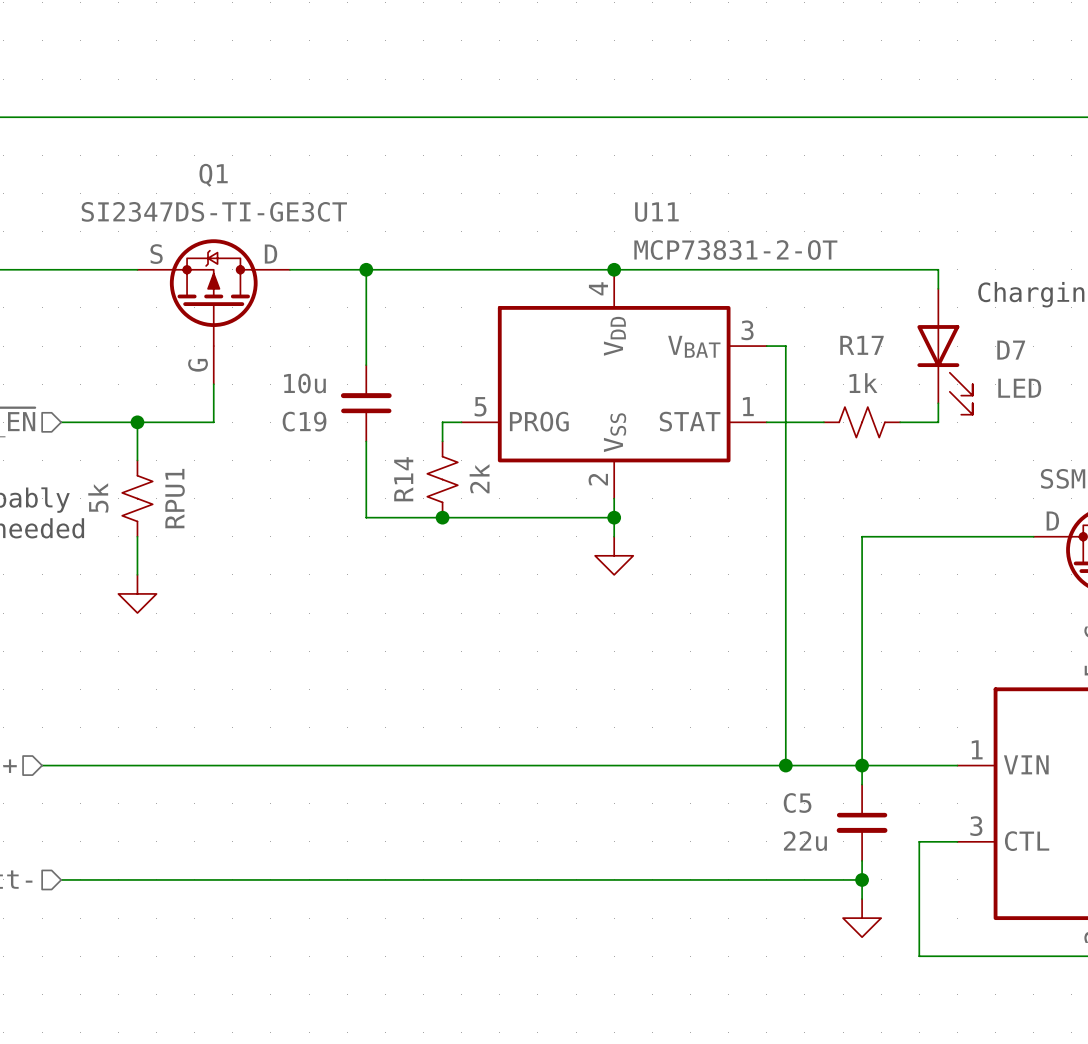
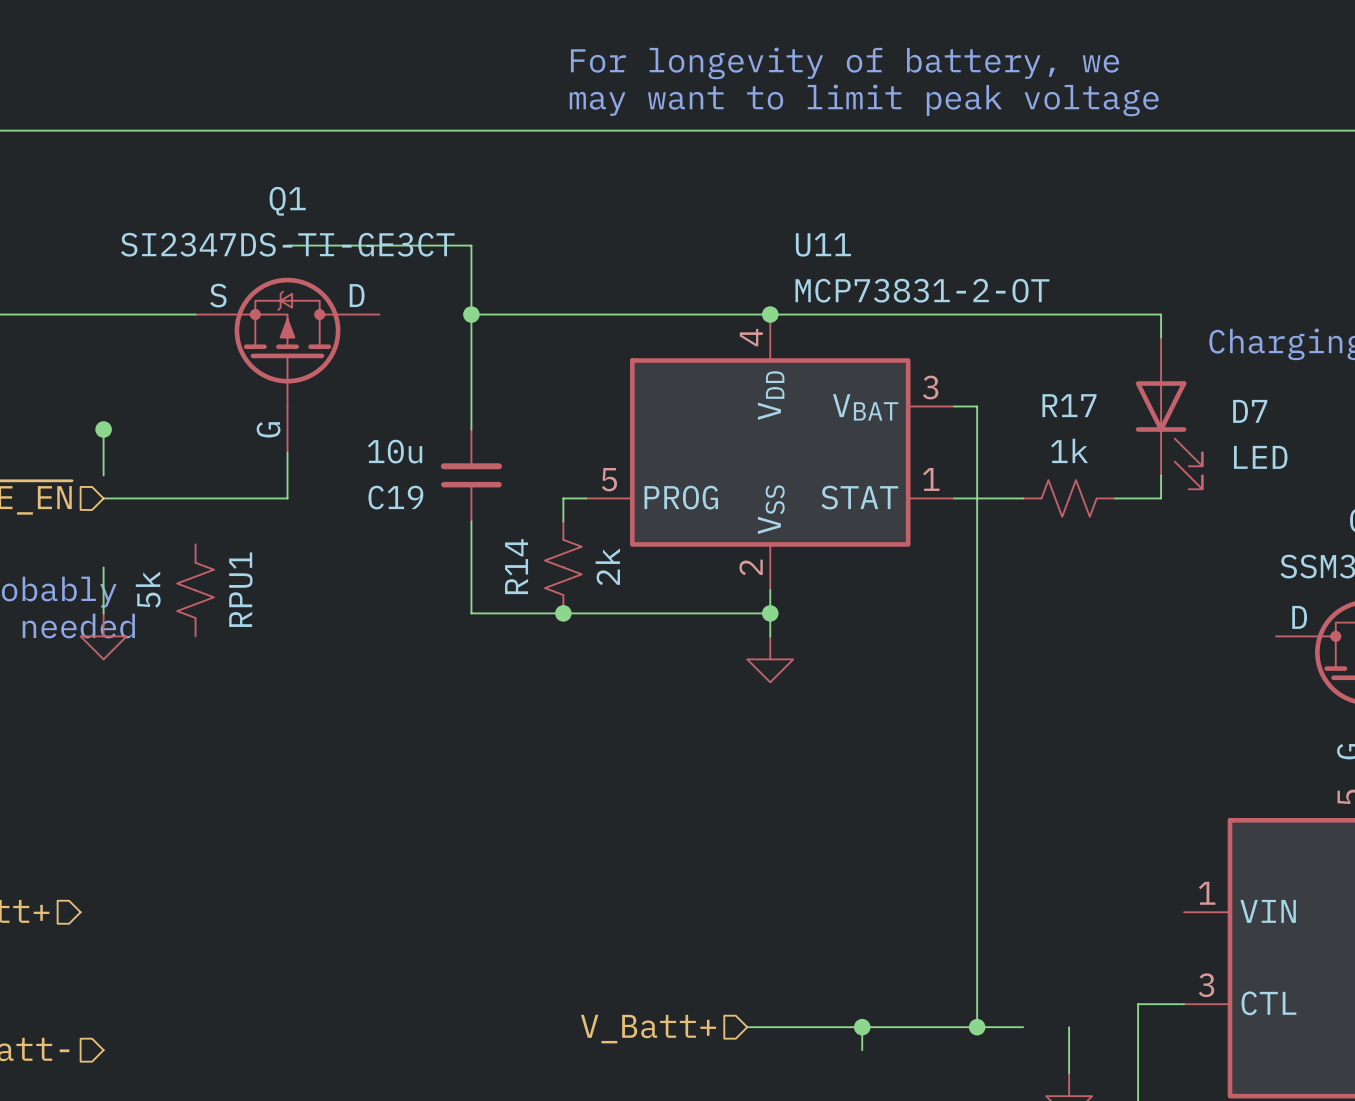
text: none -> For longevity of battery, we (845, 63)
text: none -> may want to limit peak voltage (864, 100)
wire: (290, 269) (366, 269) -> (287, 245) (471, 245) (471, 314)
junction: none -> (103, 429)
wire: (137, 422) (137, 460) -> (103, 429) (103, 475)
junction: (137, 422) -> none
wire: (137, 536) (137, 574) -> (103, 567) (103, 613)
wire: (1033, 536) (862, 536) (862, 784) -> none
power symbol position: (137, 593) -> (103, 636)
wire: (42, 765) (957, 765) -> none
wire: none -> (977, 912) (977, 1027)
junction: (785, 765) -> none
junction: (862, 765) -> none
C5: 22u (862, 822) -> none
wire: none -> (747, 1027) (1023, 1027)
wire: none -> (862, 1027) (862, 1050)
junction: none -> (862, 1027)
junction: none -> (977, 1027)
hierarchical label: none -> V_Batt+ (648, 1029)
wire: (61, 879) (862, 879) -> none
junction: (862, 879) -> none

